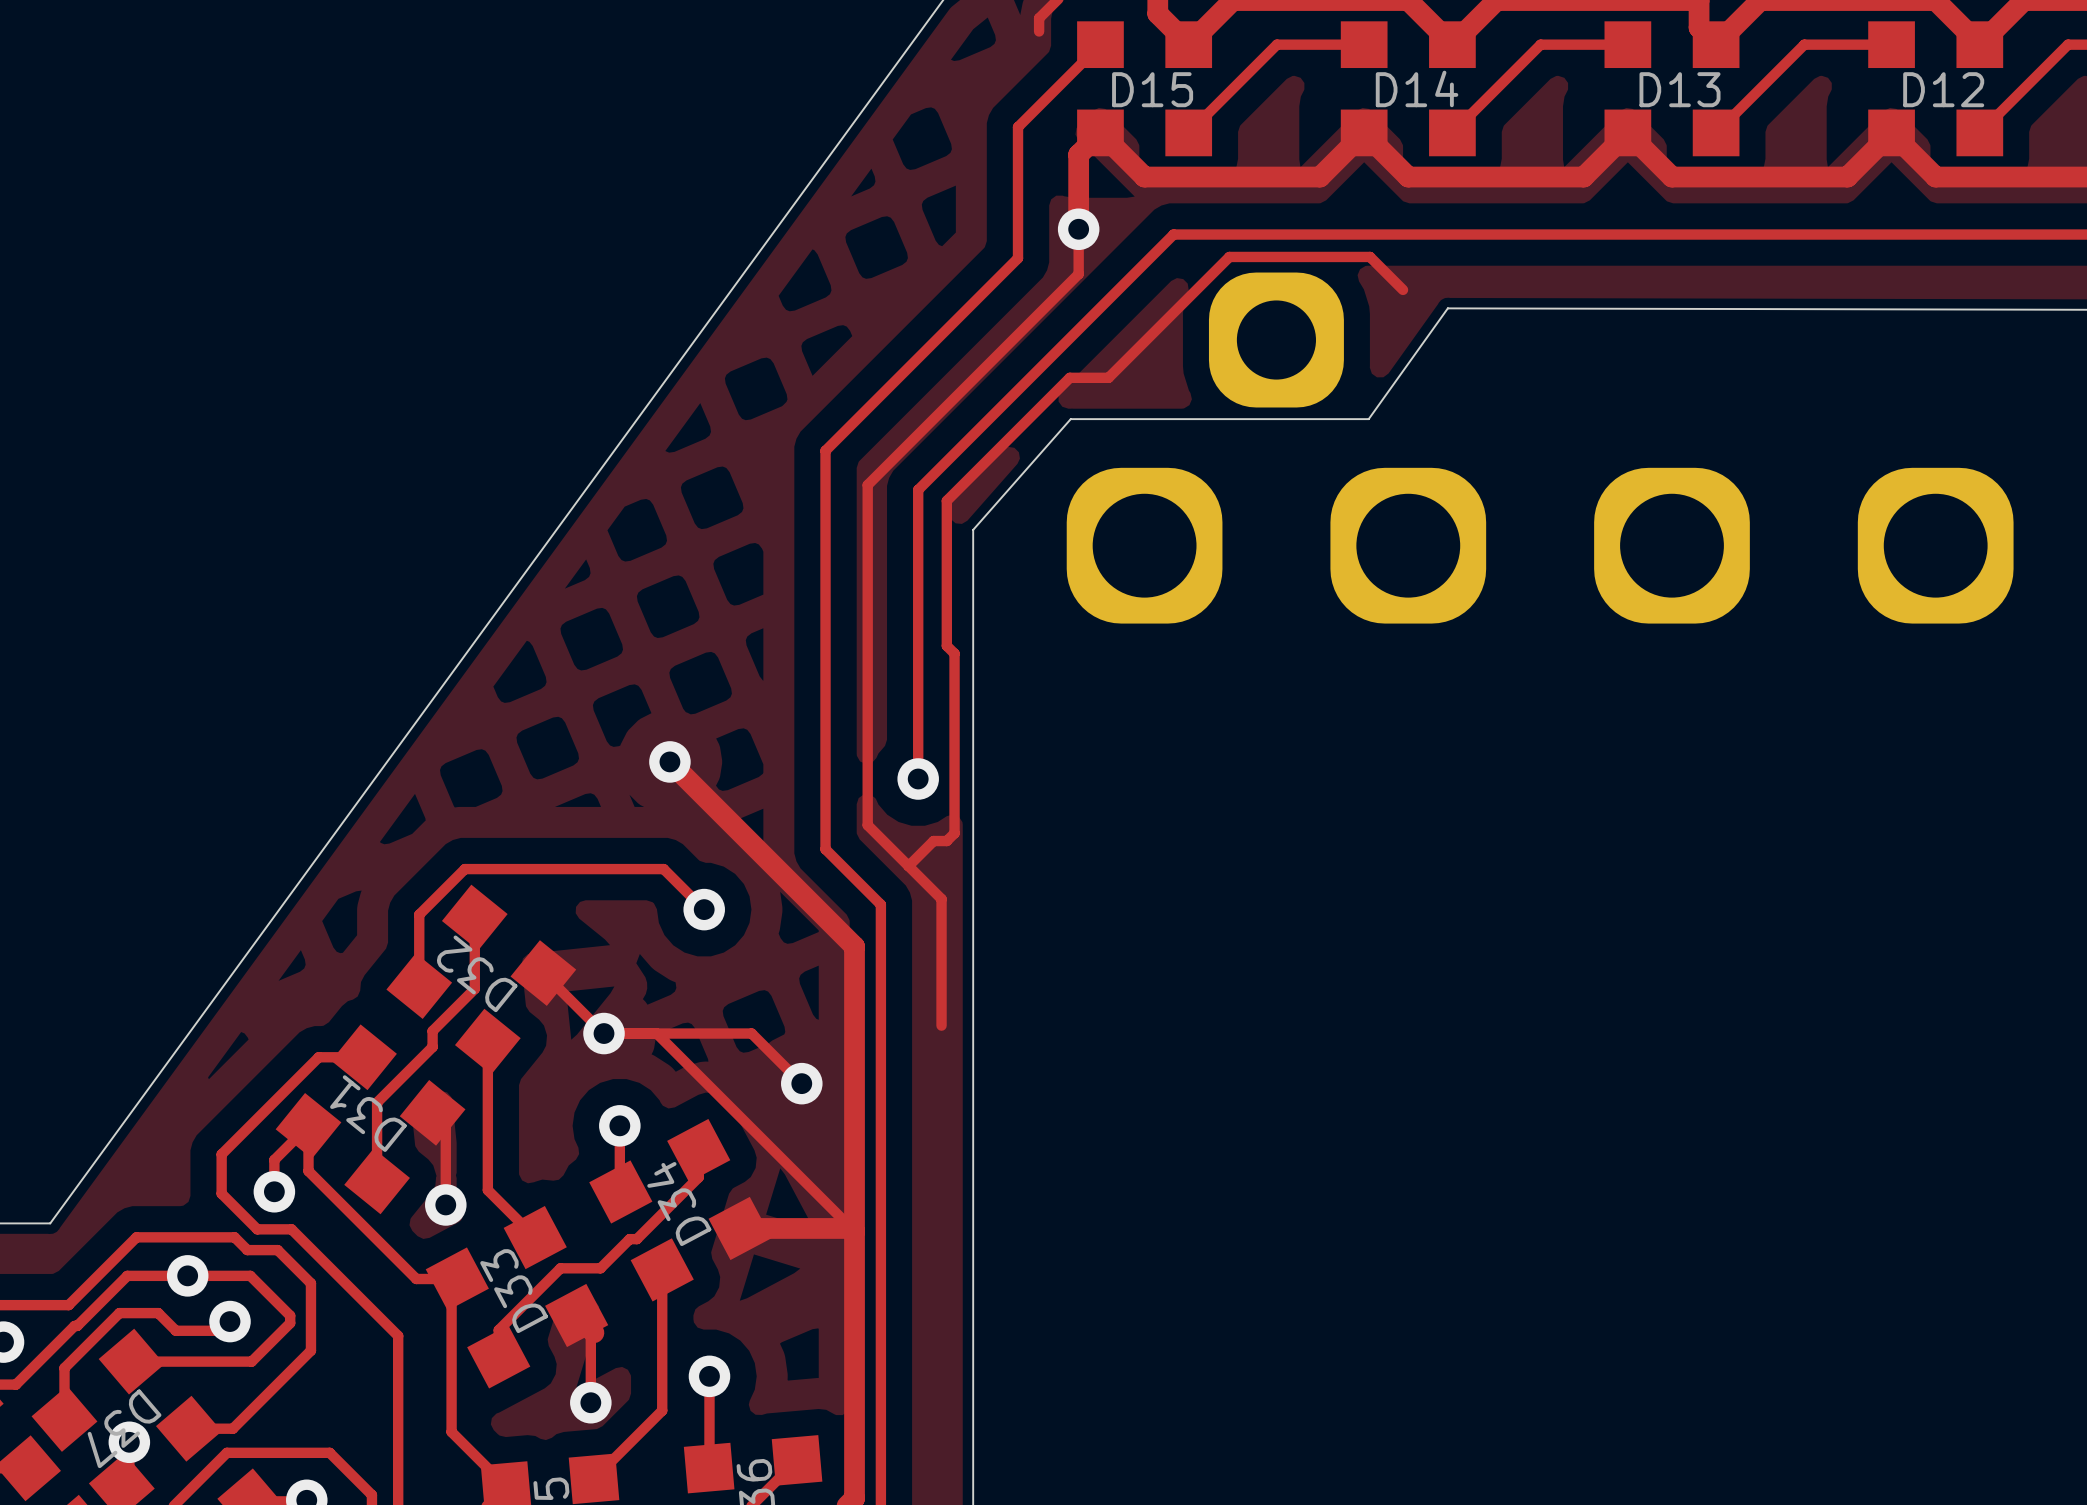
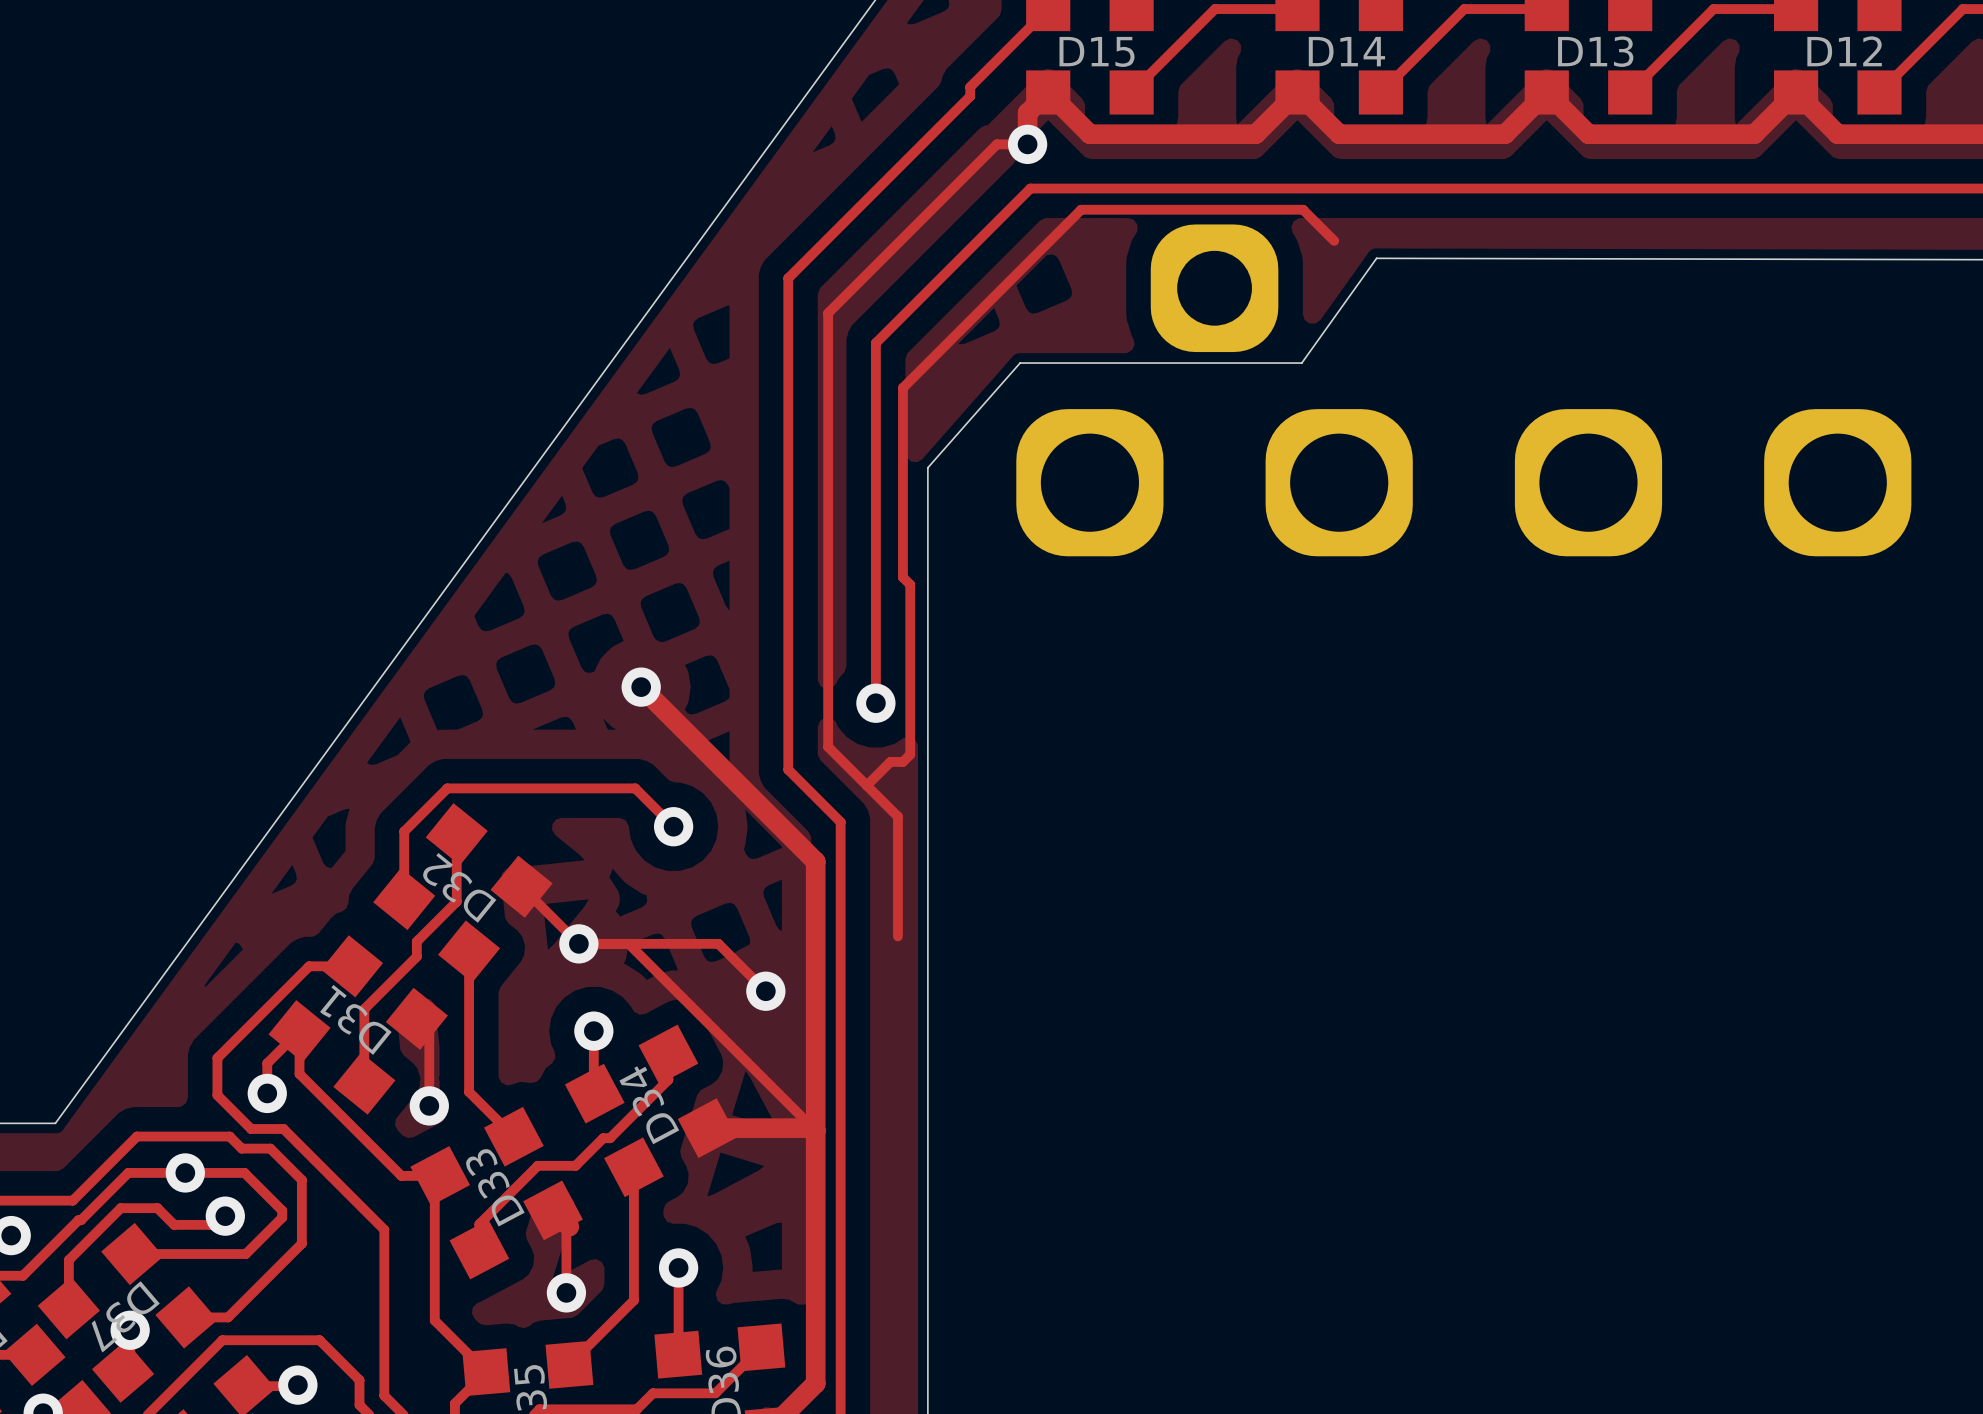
track: (1018, 136) (1018, 258) (825, 450) -> (970, 96) (788, 278) (788, 392)
track: (1078, 187) (1078, 274) (867, 485) -> (1027, 144) (996, 144) (828, 313) (828, 425)
via position: (1078, 229) -> (1027, 144)
track: (1173, 234) (918, 489) -> (1117, 188) (1030, 188) (875, 343) (875, 429)
track: (1229, 256) (1108, 377) (1069, 377) (946, 500) -> (1170, 209) (1081, 209) (902, 387) (902, 440)

